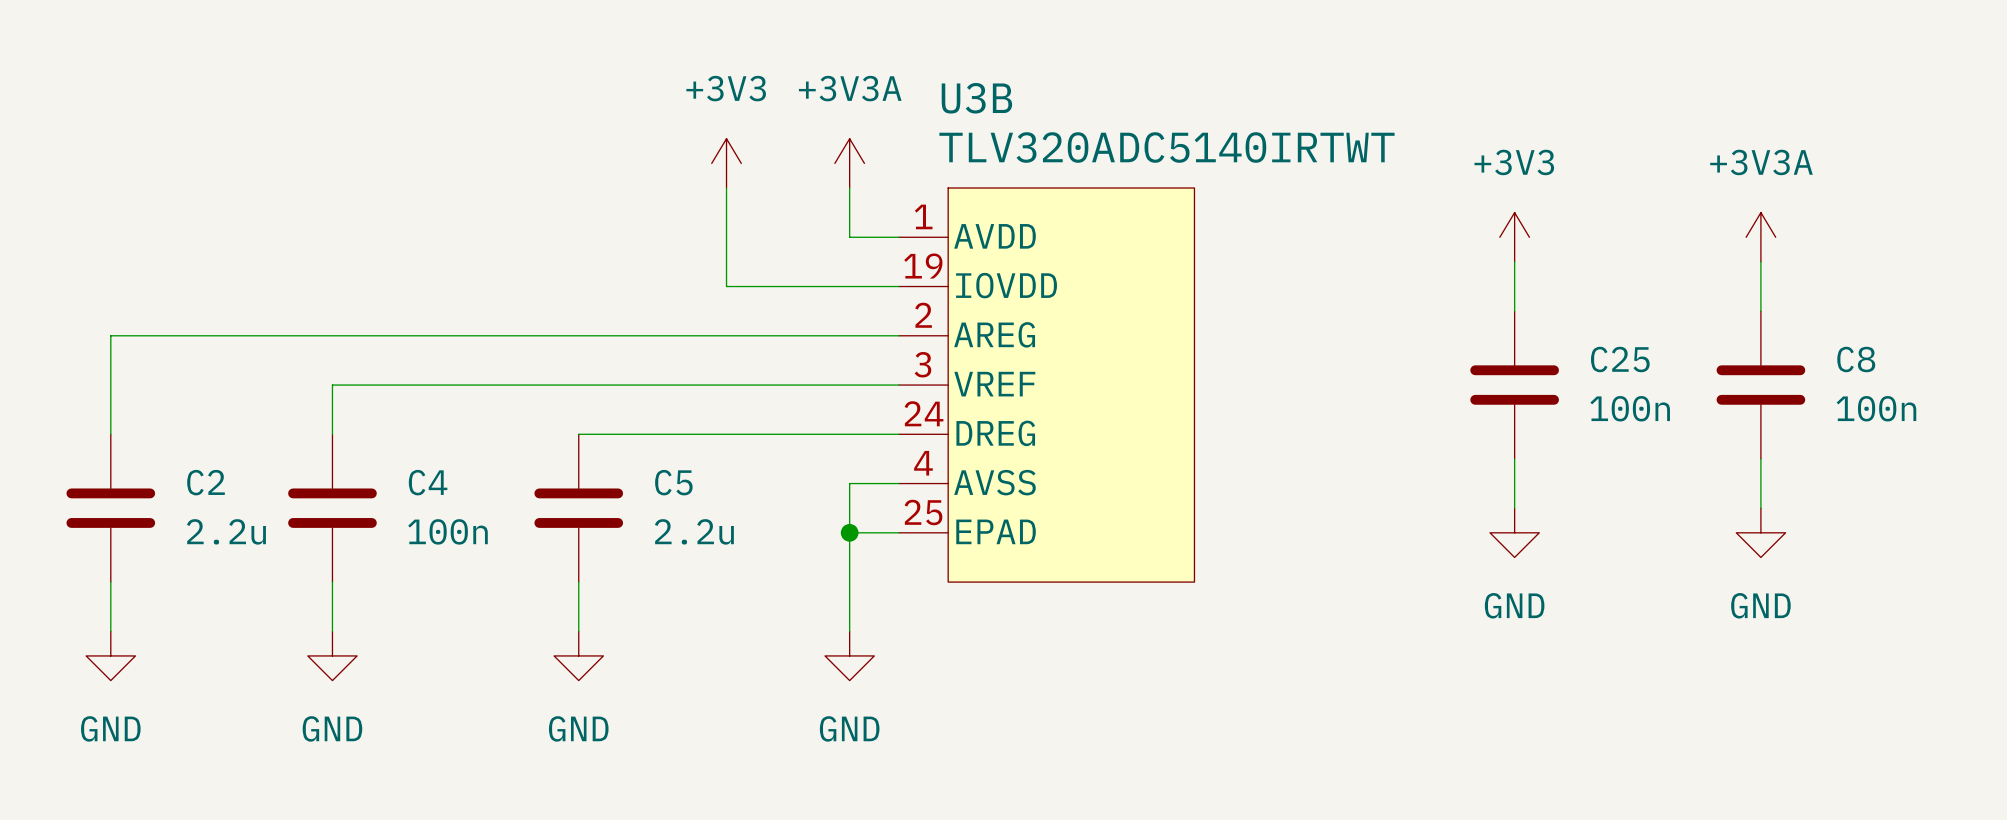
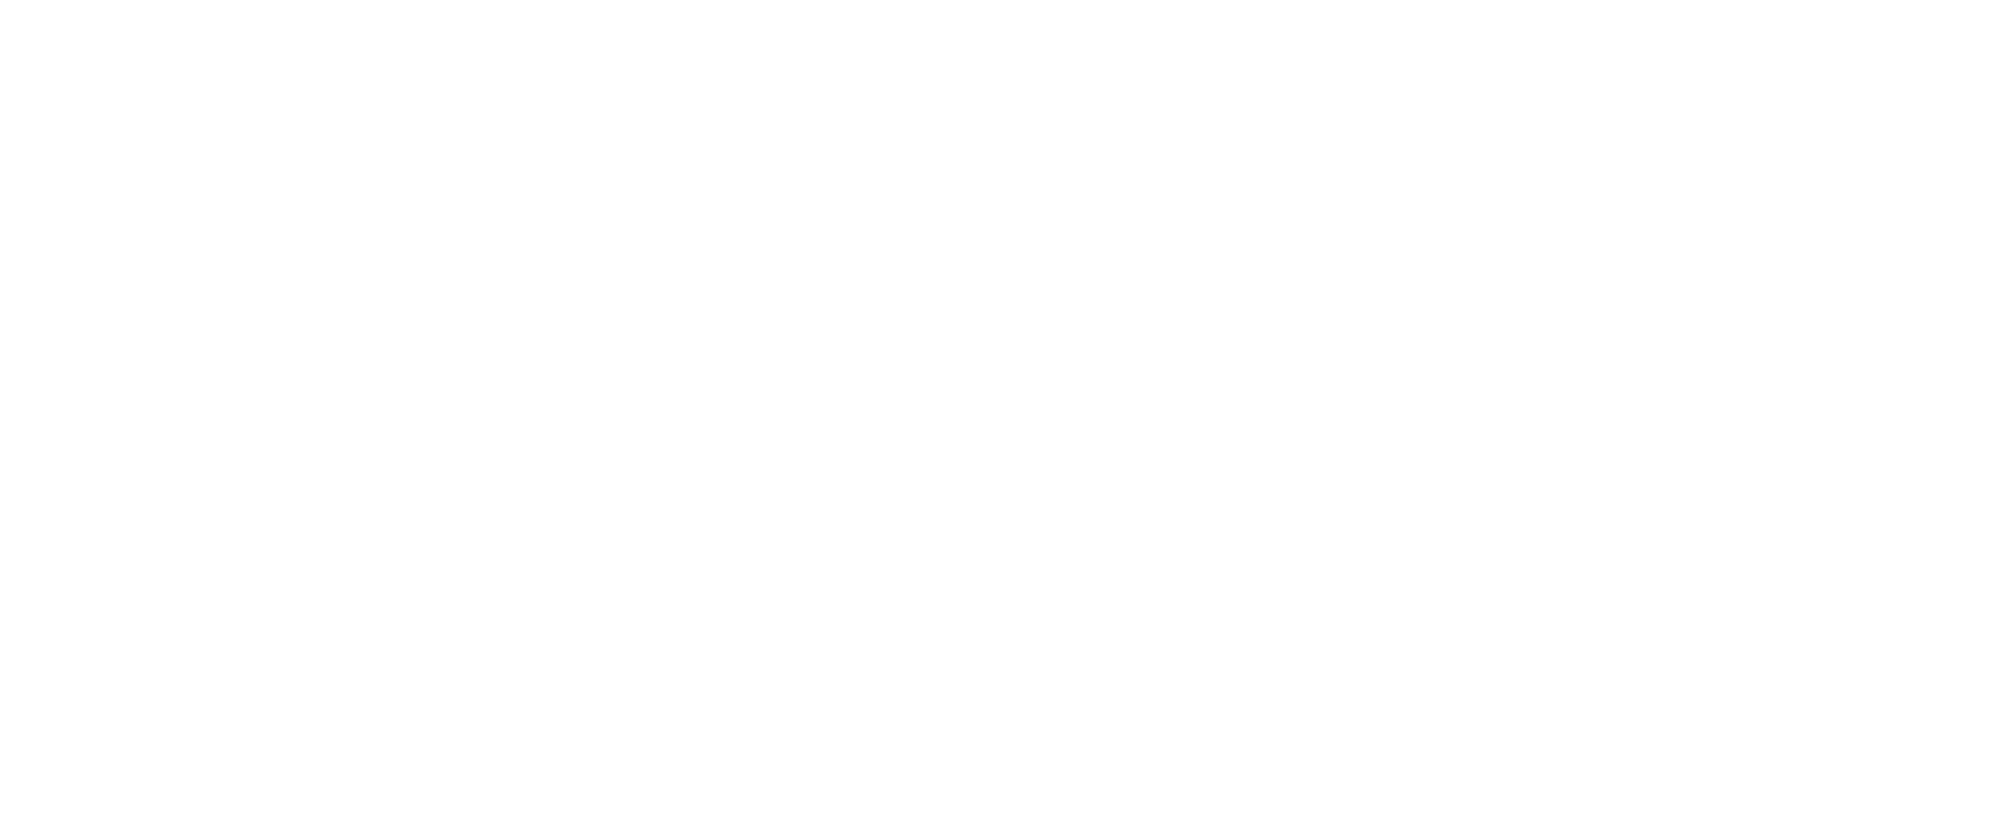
power symbol: +3V3 (726, 163) -> none
power symbol: +3V3A (849, 163) -> none
wire: (726, 188) (726, 286) (898, 286) -> none
wire: (849, 188) (849, 237) (898, 237) -> none
power symbol: +3V3 (1514, 237) -> none
power symbol: +3V3A (1760, 237) -> none
wire: (1514, 261) (1514, 311) -> none
wire: (1760, 261) (1760, 311) -> none
wire: (898, 335) (110, 335) (110, 434) -> none
wire: (898, 385) (332, 385) (332, 434) -> none
U3B: TLV320ADC5140IRTWT (1046, 385) -> none
C25: 100n (1514, 385) -> none
C8: 100n (1760, 385) -> none
wire: (578, 434) (898, 434) -> none
wire: (1514, 458) (1514, 508) -> none
wire: (1760, 458) (1760, 508) -> none
wire: (898, 483) (849, 483) (849, 631) -> none
C2: 2.2u (110, 508) -> none
C4: 100n (332, 508) -> none
C5: 2.2u (578, 508) -> none
wire: (849, 532) (898, 532) -> none
junction: (849, 532) -> none
power symbol: GND (1514, 532) -> none
power symbol: GND (1760, 532) -> none
wire: (110, 582) (110, 631) -> none
wire: (332, 582) (332, 631) -> none
wire: (578, 582) (578, 631) -> none
power symbol: GND (110, 655) -> none
power symbol: GND (332, 655) -> none
power symbol: GND (578, 655) -> none
power symbol: GND (849, 655) -> none

